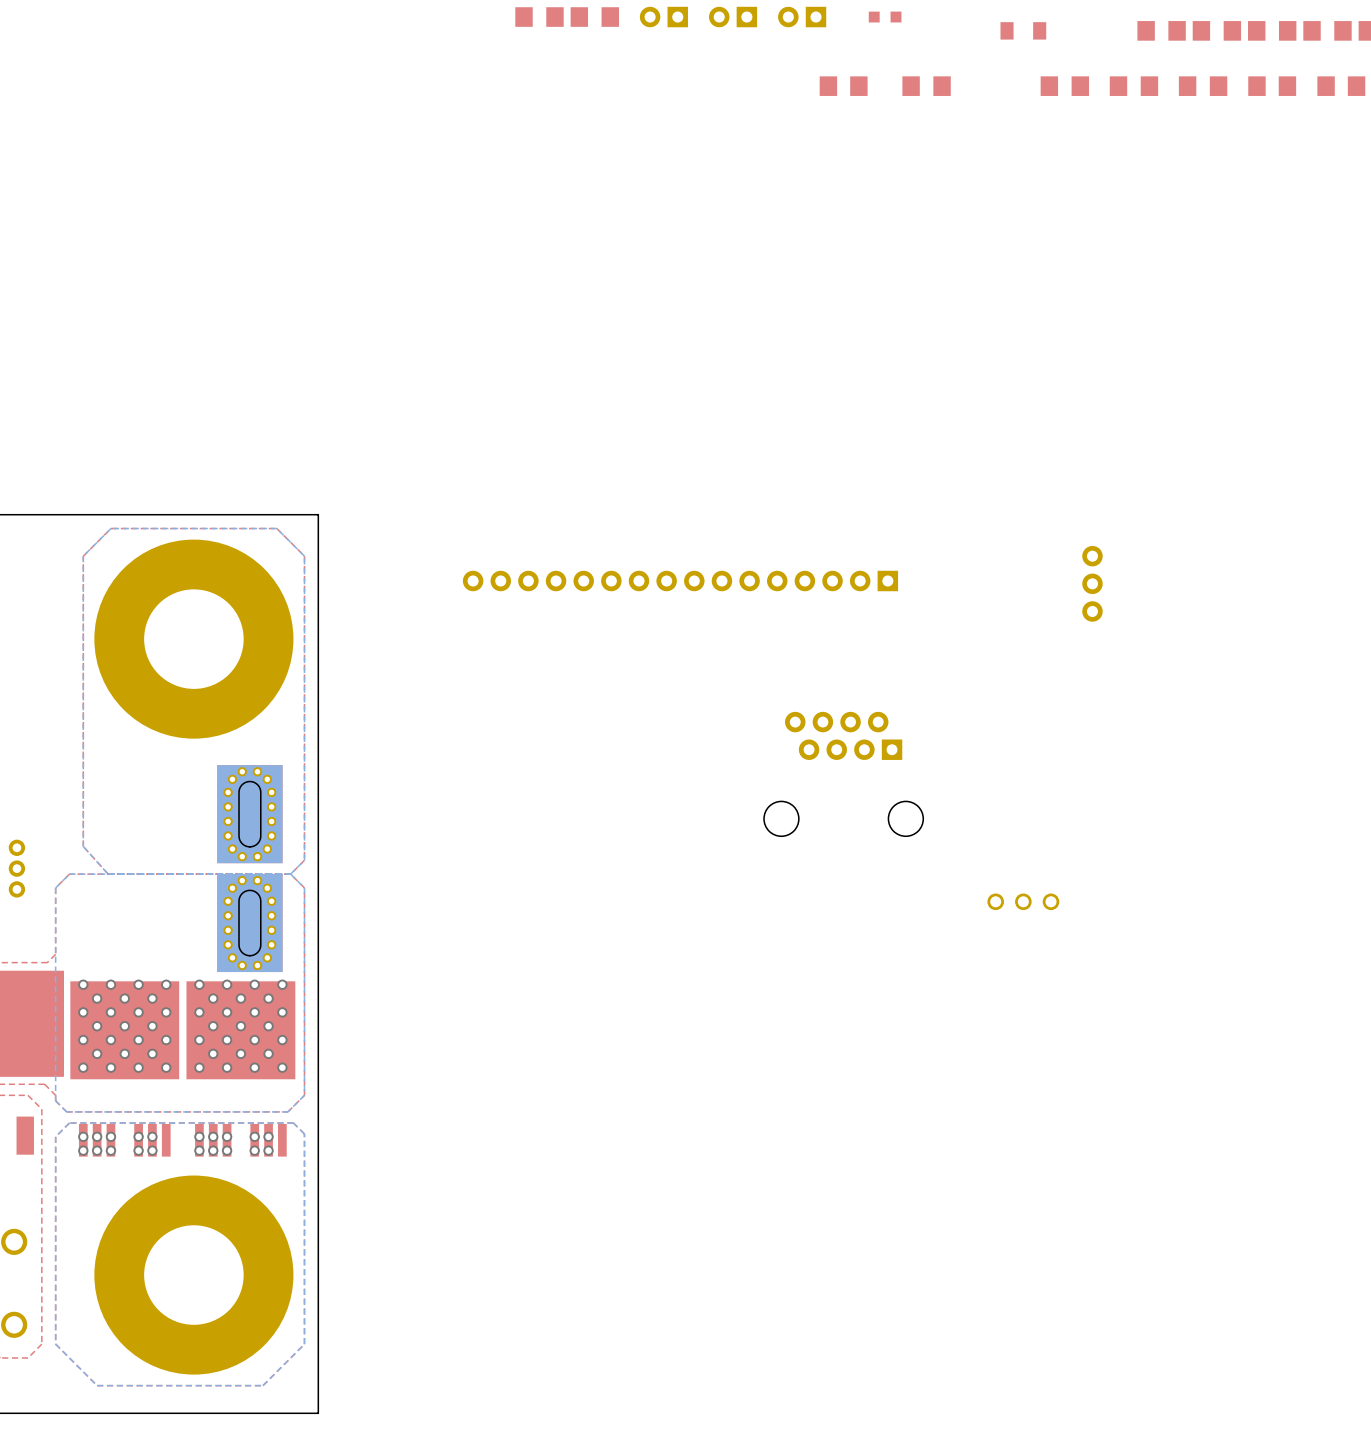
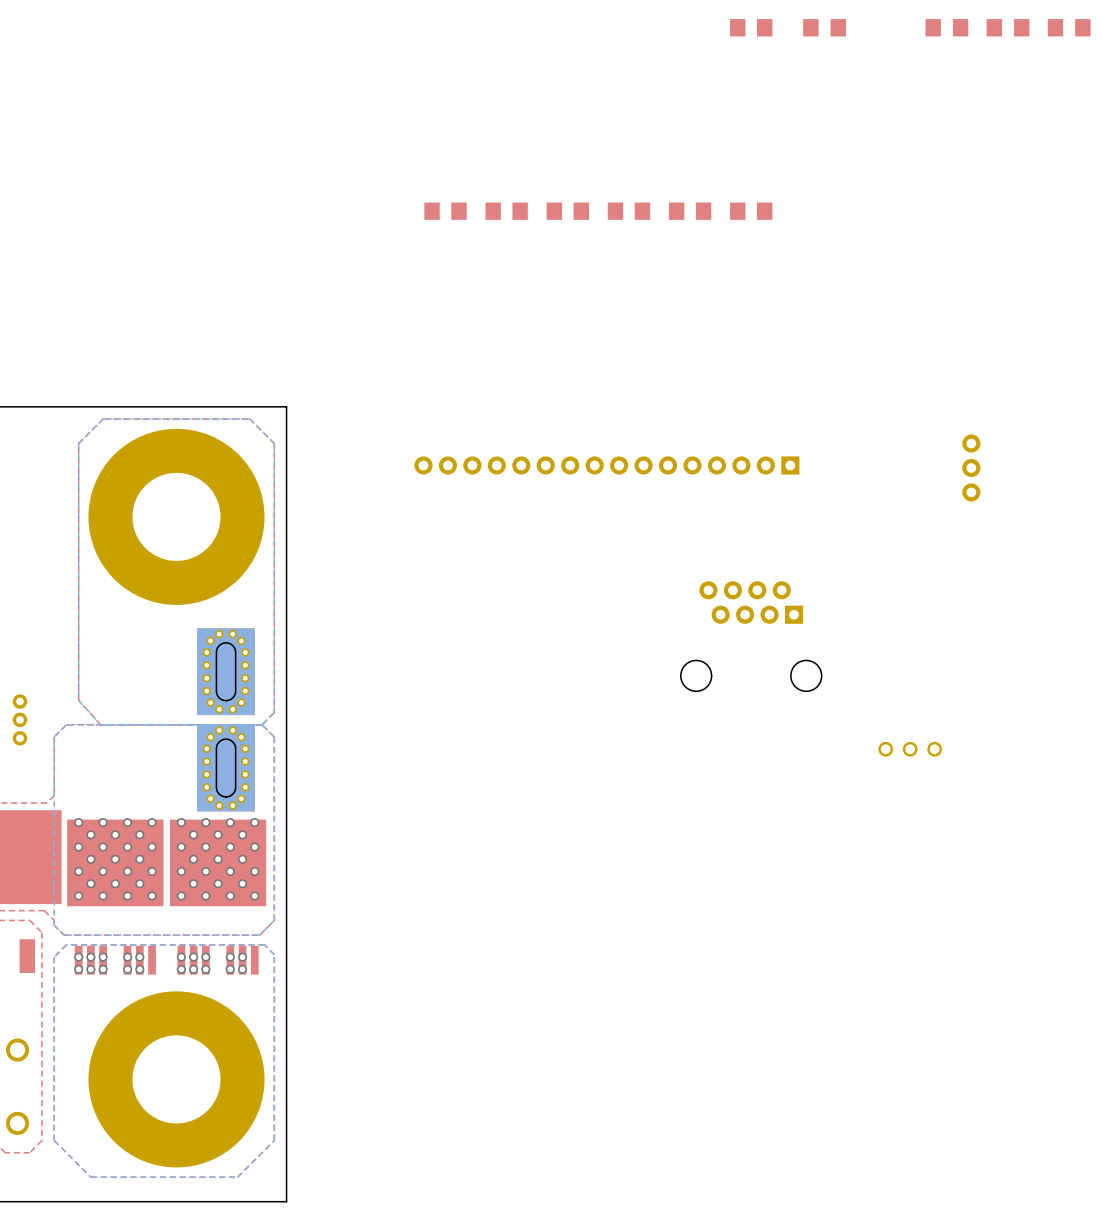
part: none -> (445, 211)
part: none -> (506, 211)
part: none -> (567, 211)
part: none -> (628, 211)
part: none -> (690, 211)
part: none -> (751, 211)

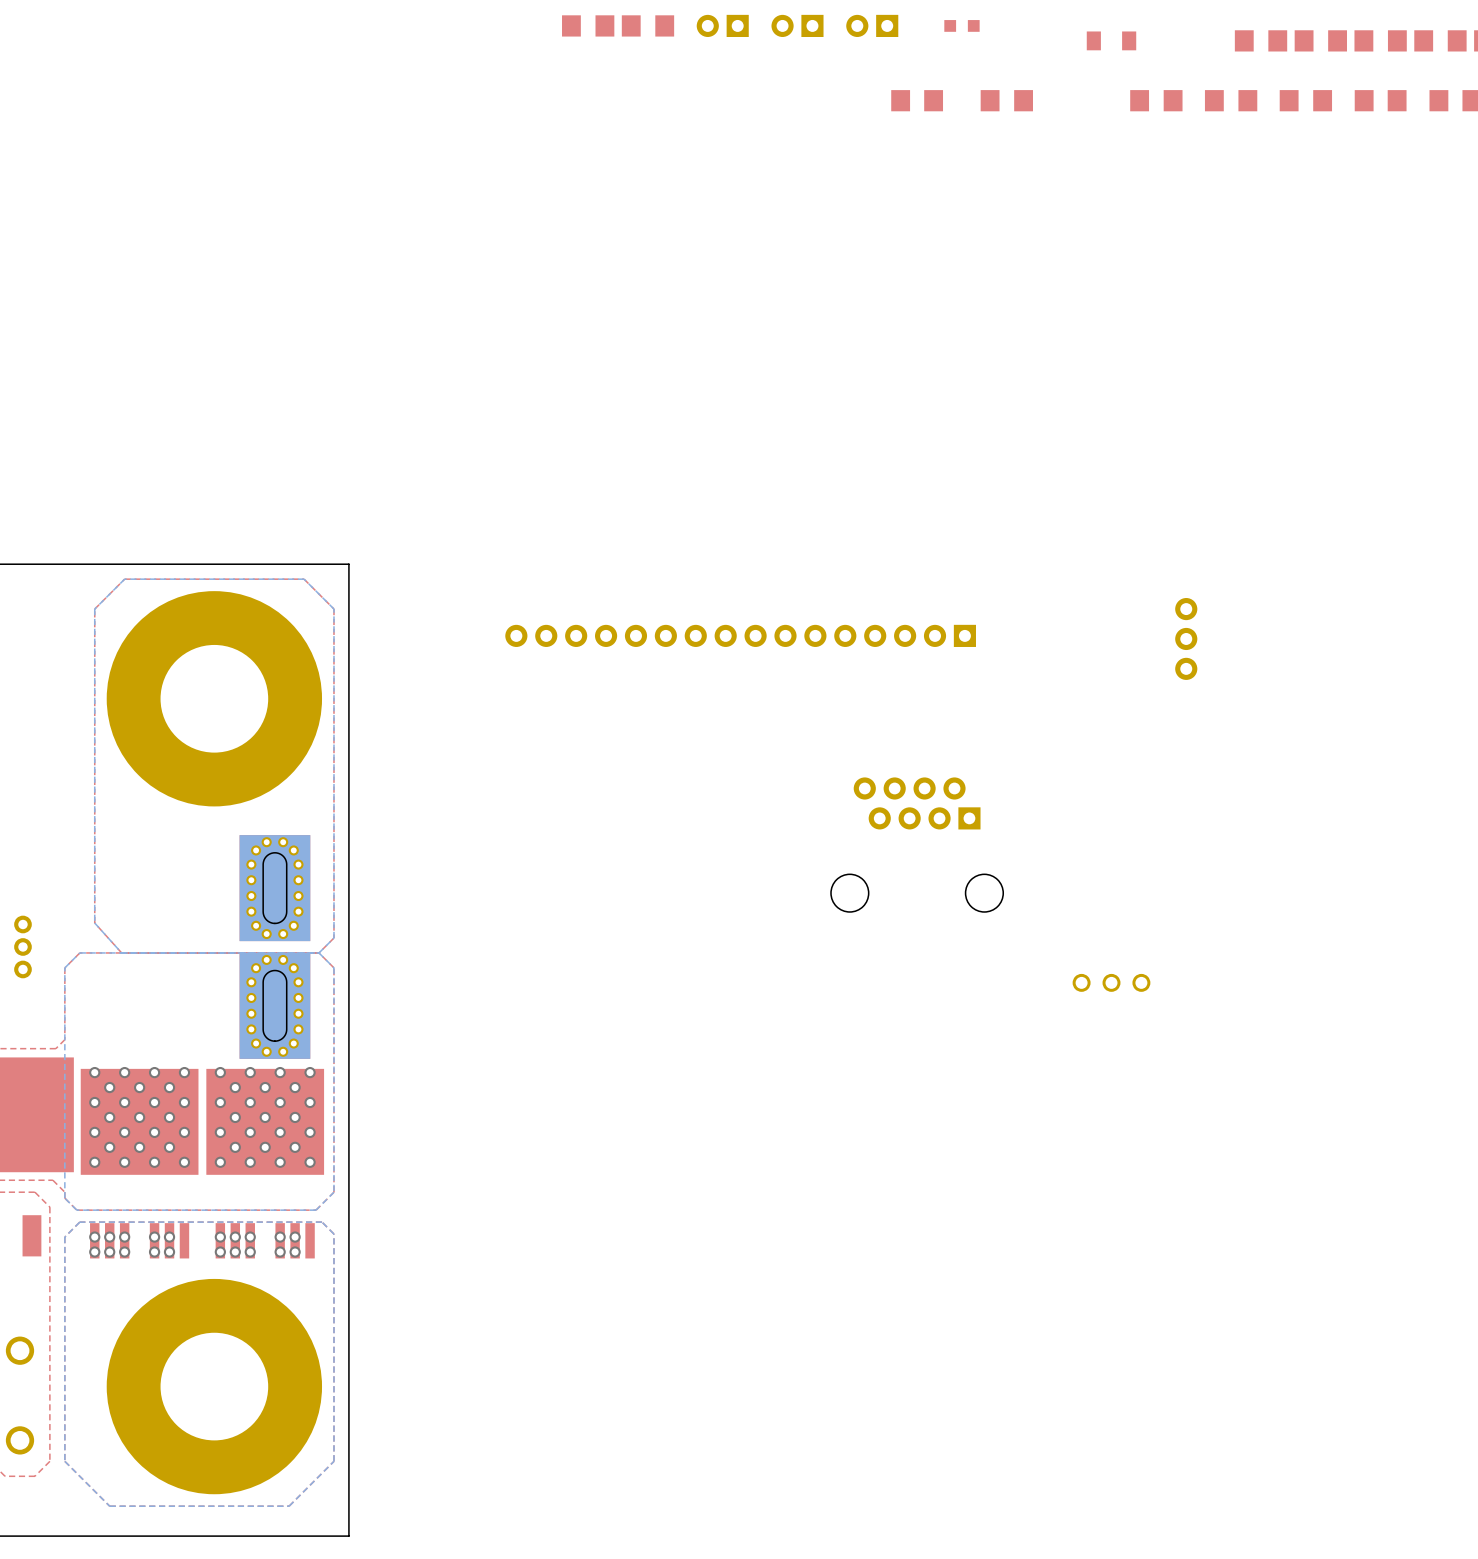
part: (445, 211) -> none
part: (506, 211) -> none
part: (567, 211) -> none
part: (628, 211) -> none
part: (690, 211) -> none
part: (751, 211) -> none

